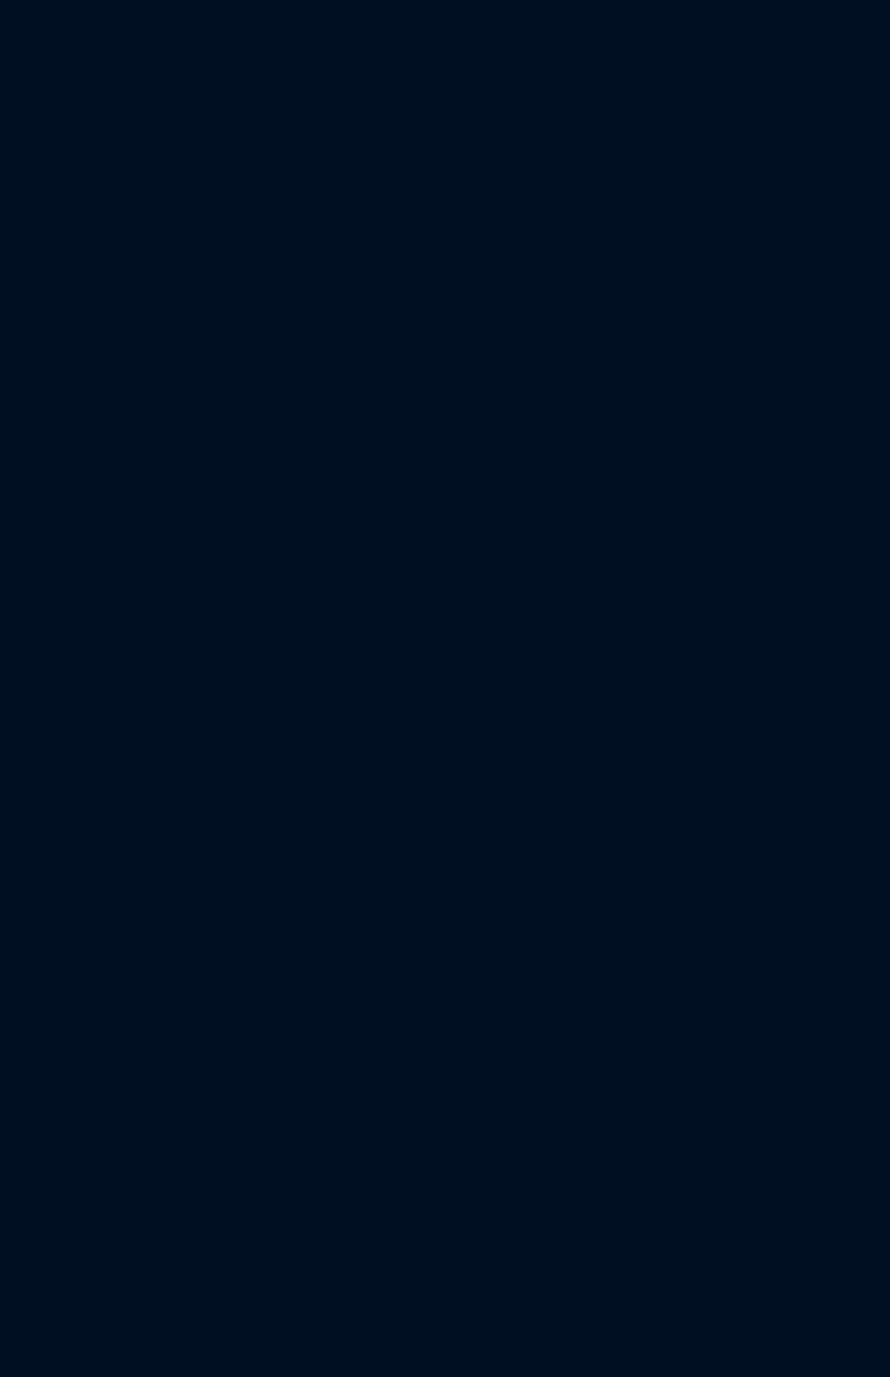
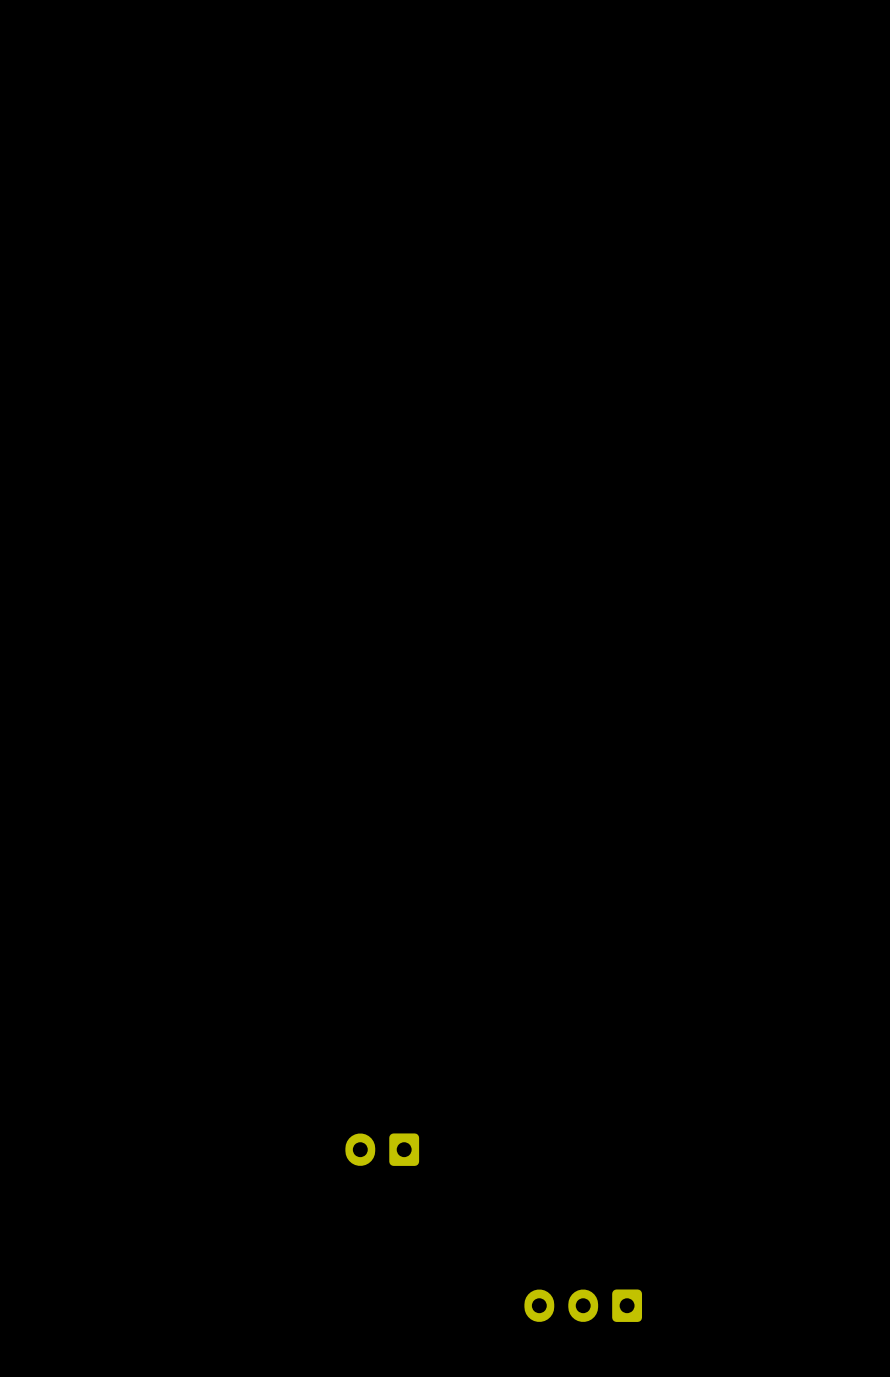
part: none -> (382, 1149)
part: none -> (583, 1305)

